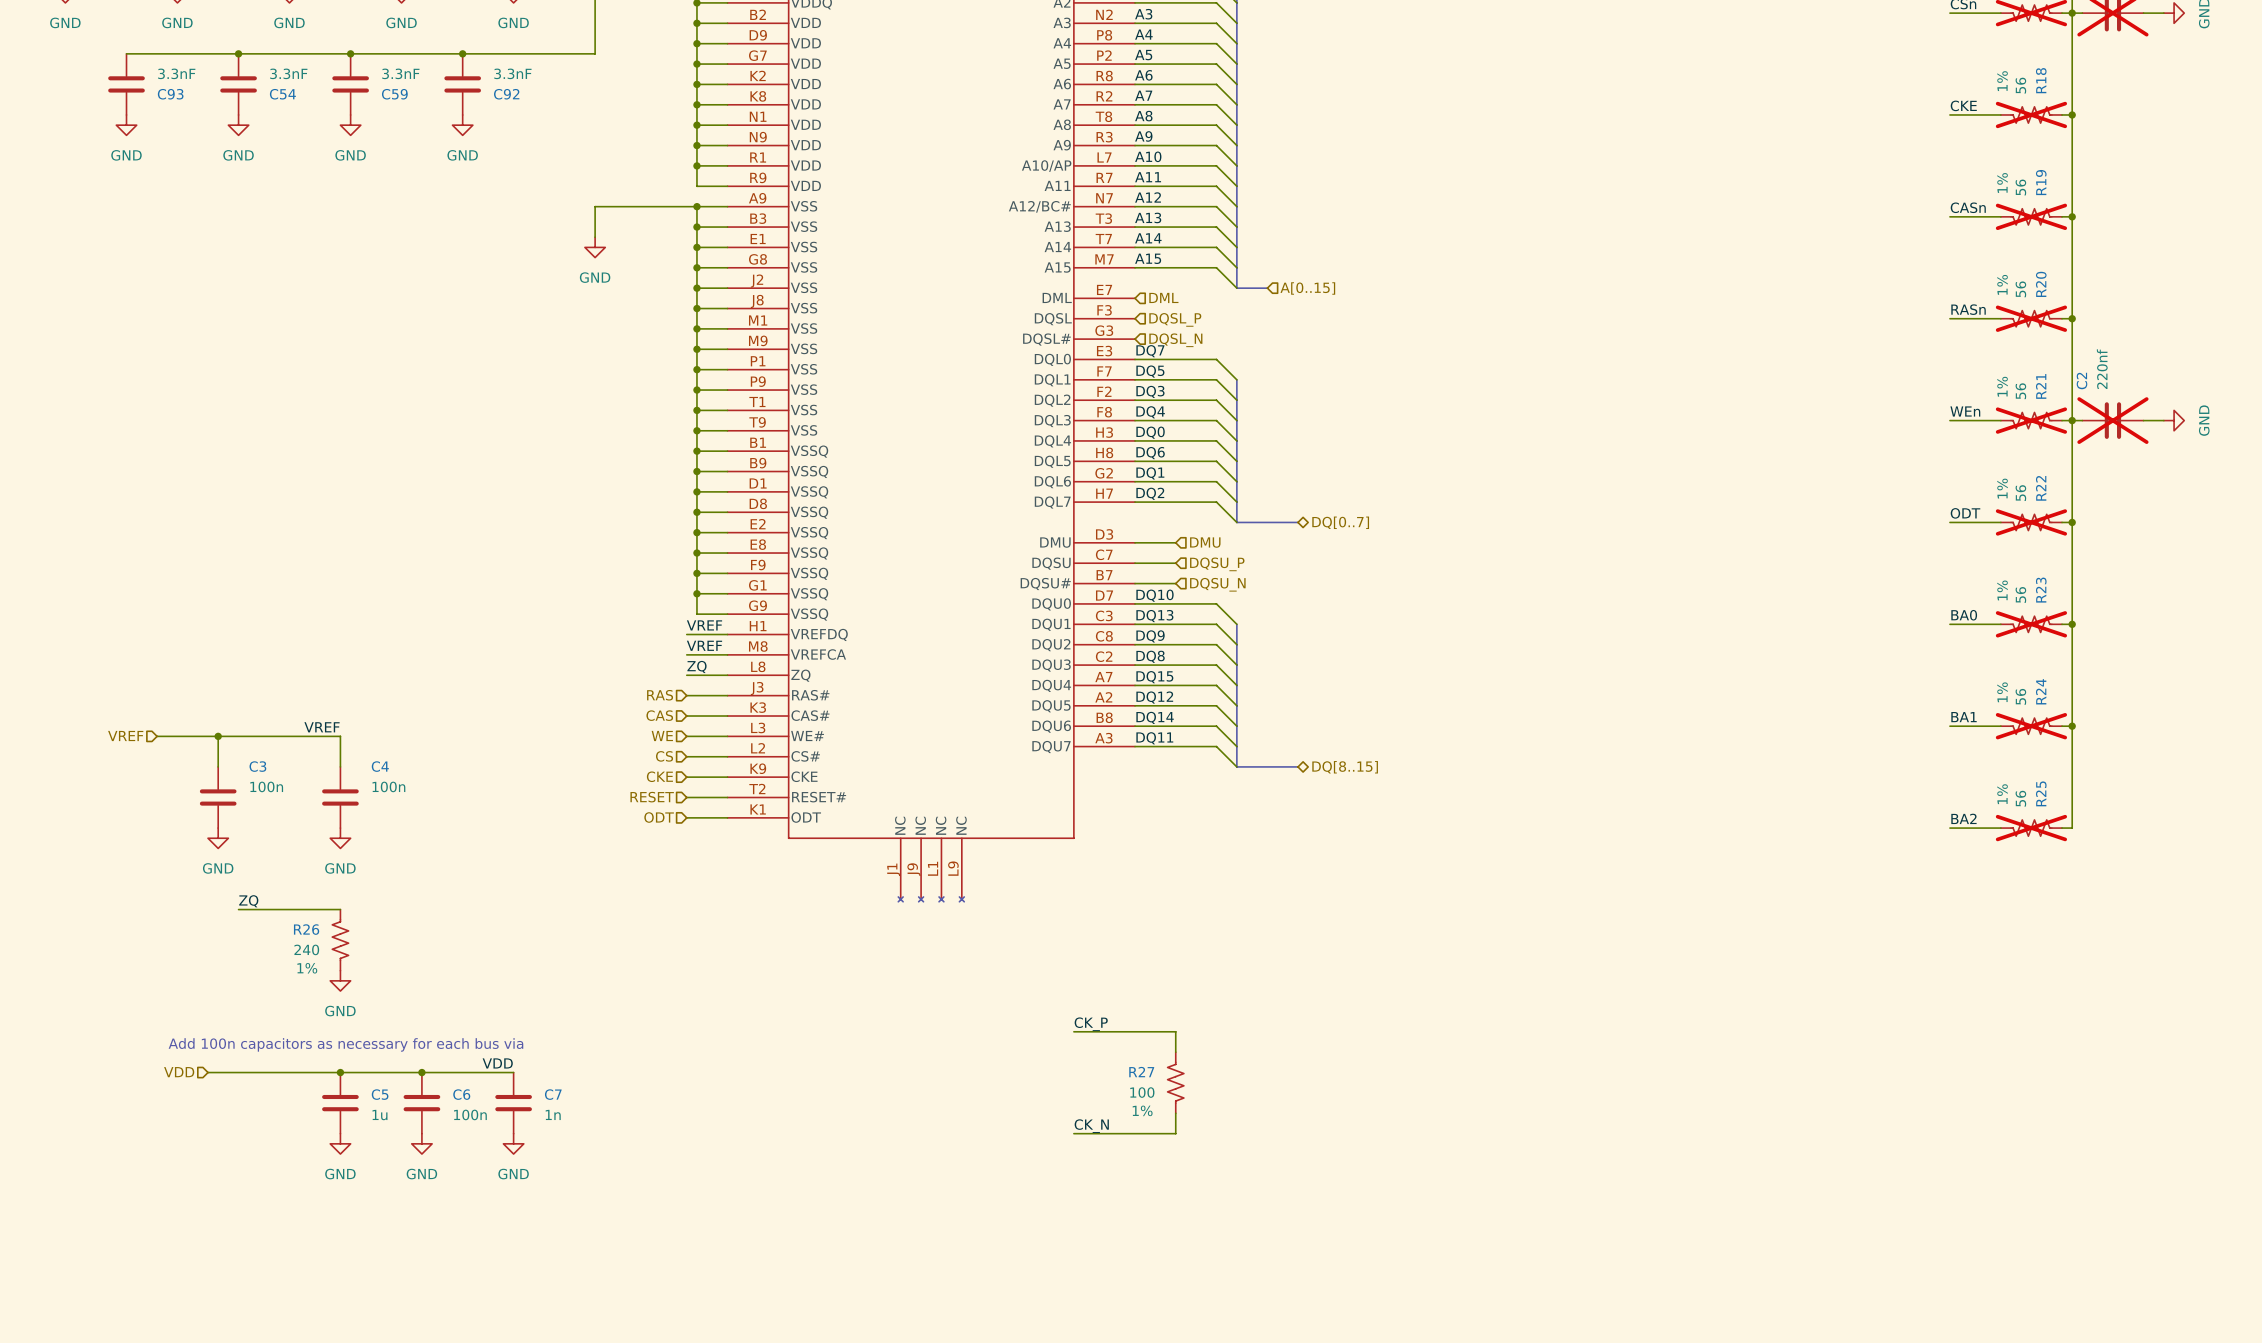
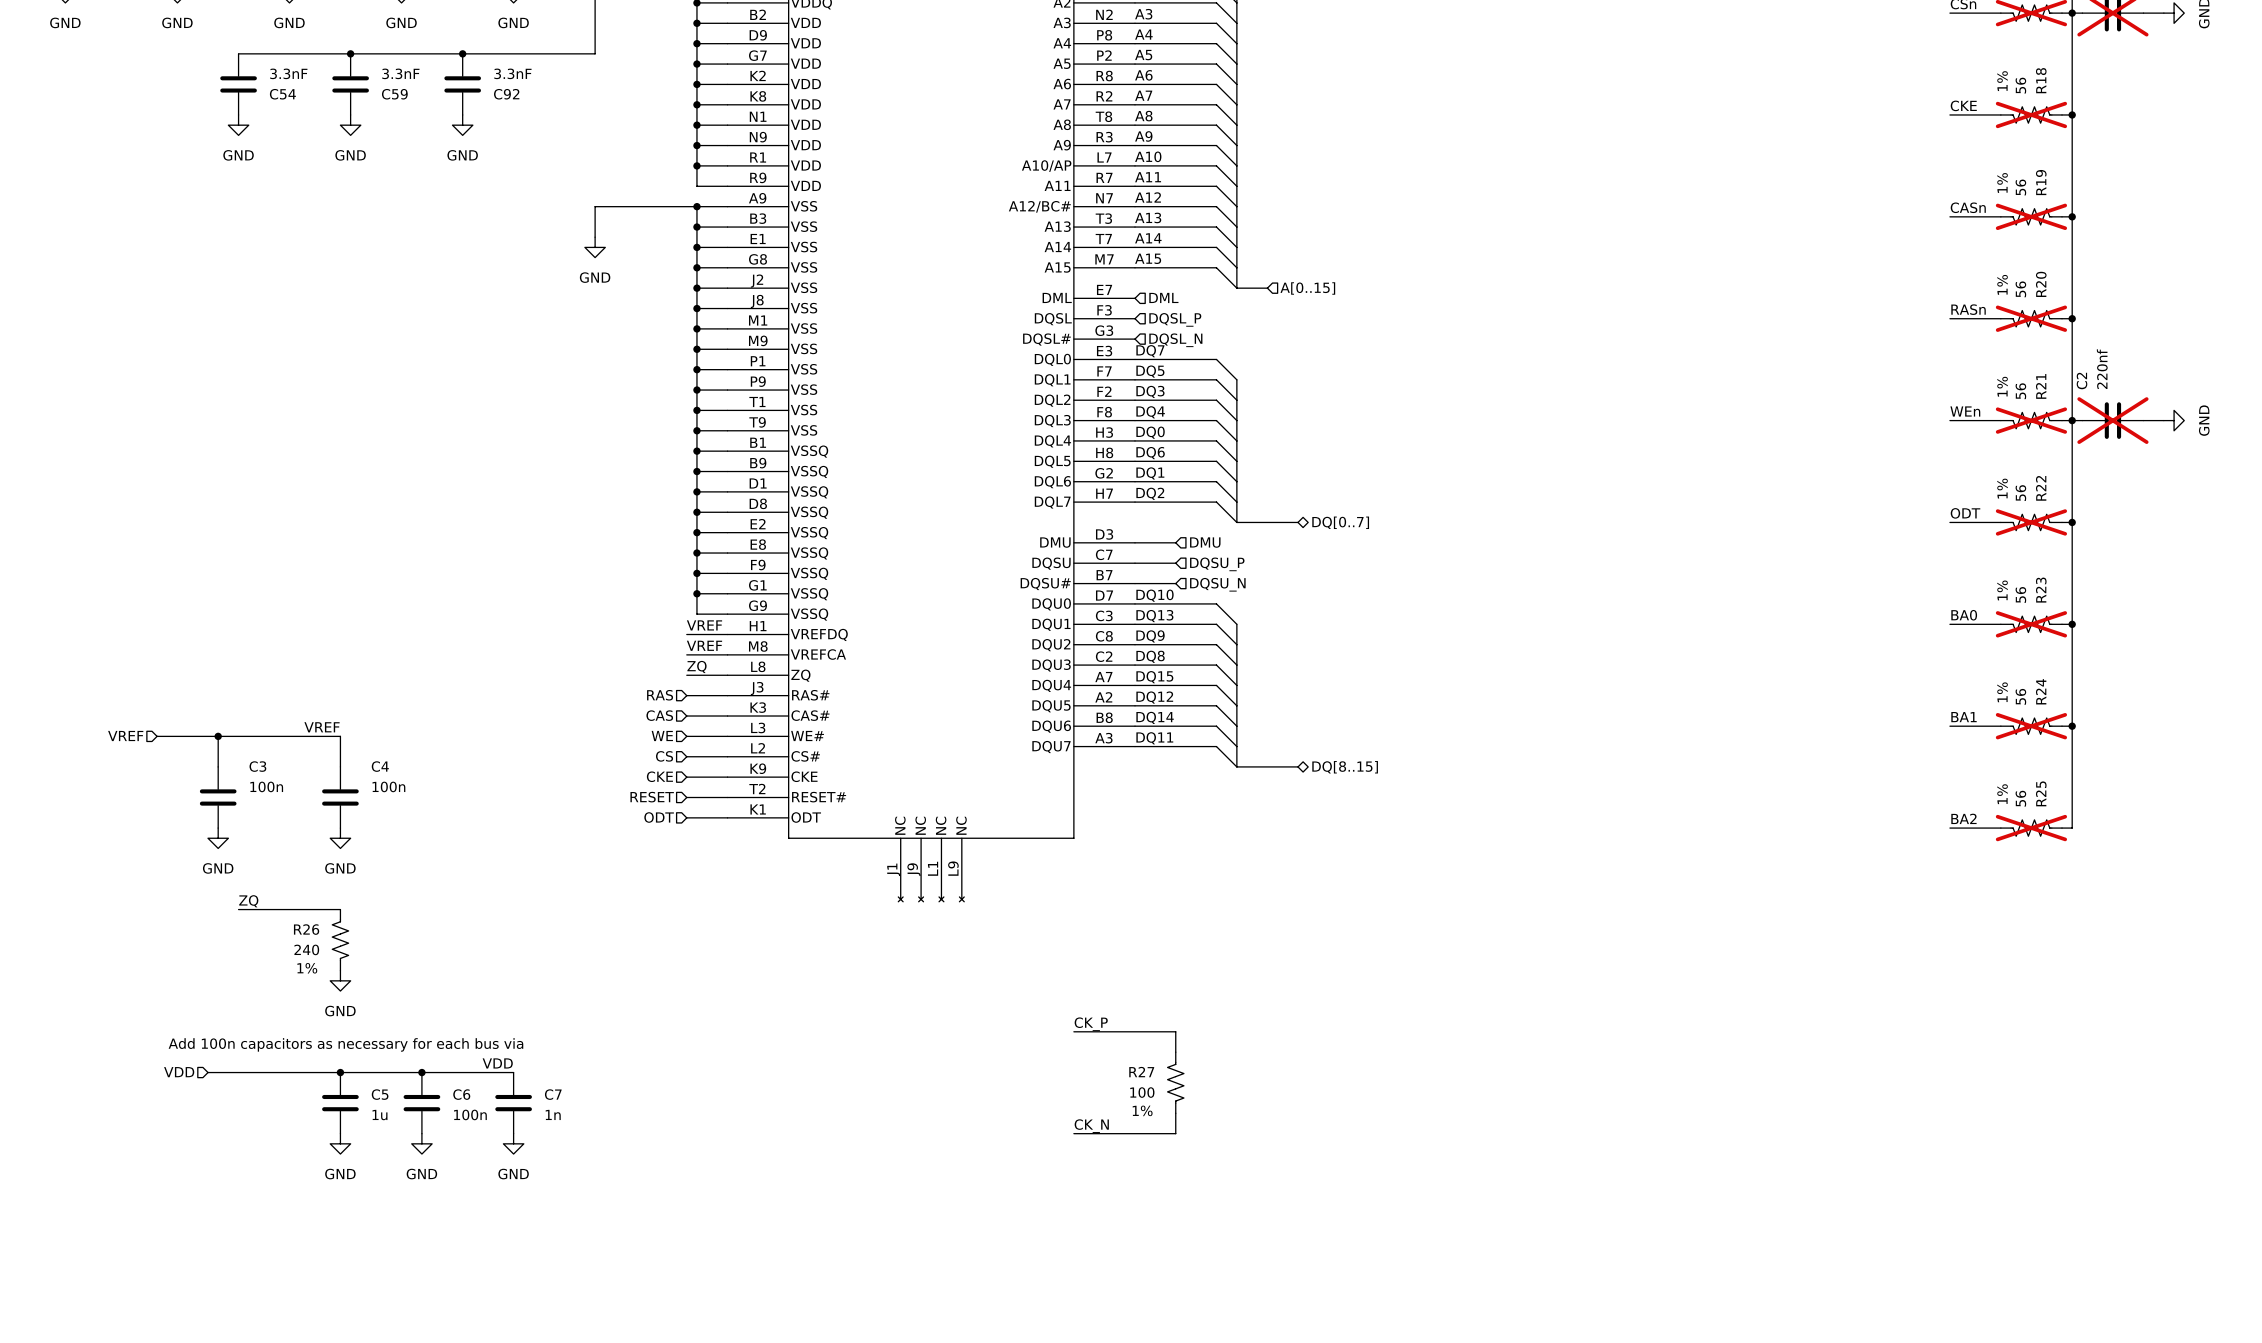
wire: (126, 53) (238, 53) -> none
junction: (238, 53) -> none
C93: 3.3nF (126, 84) -> none
power symbol: GND (126, 125) -> none

